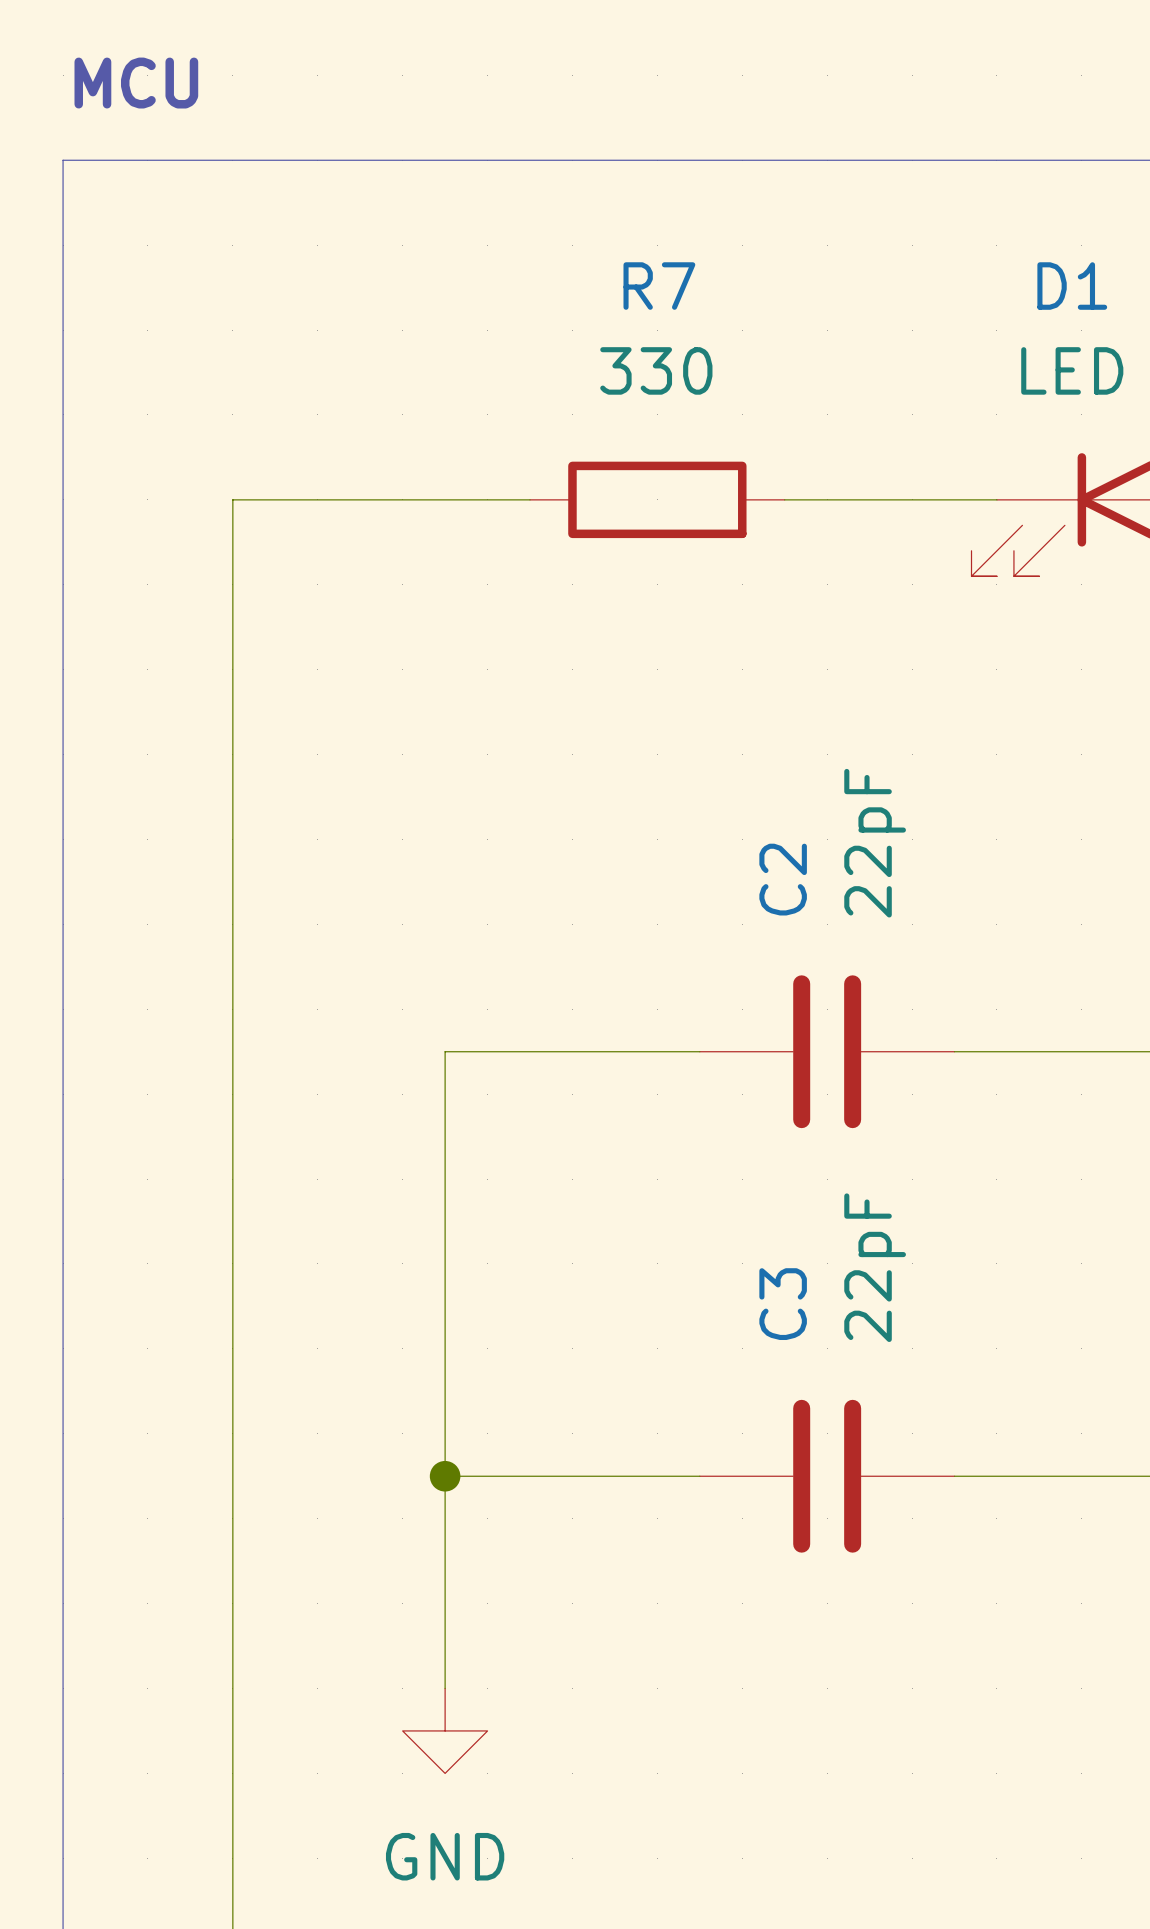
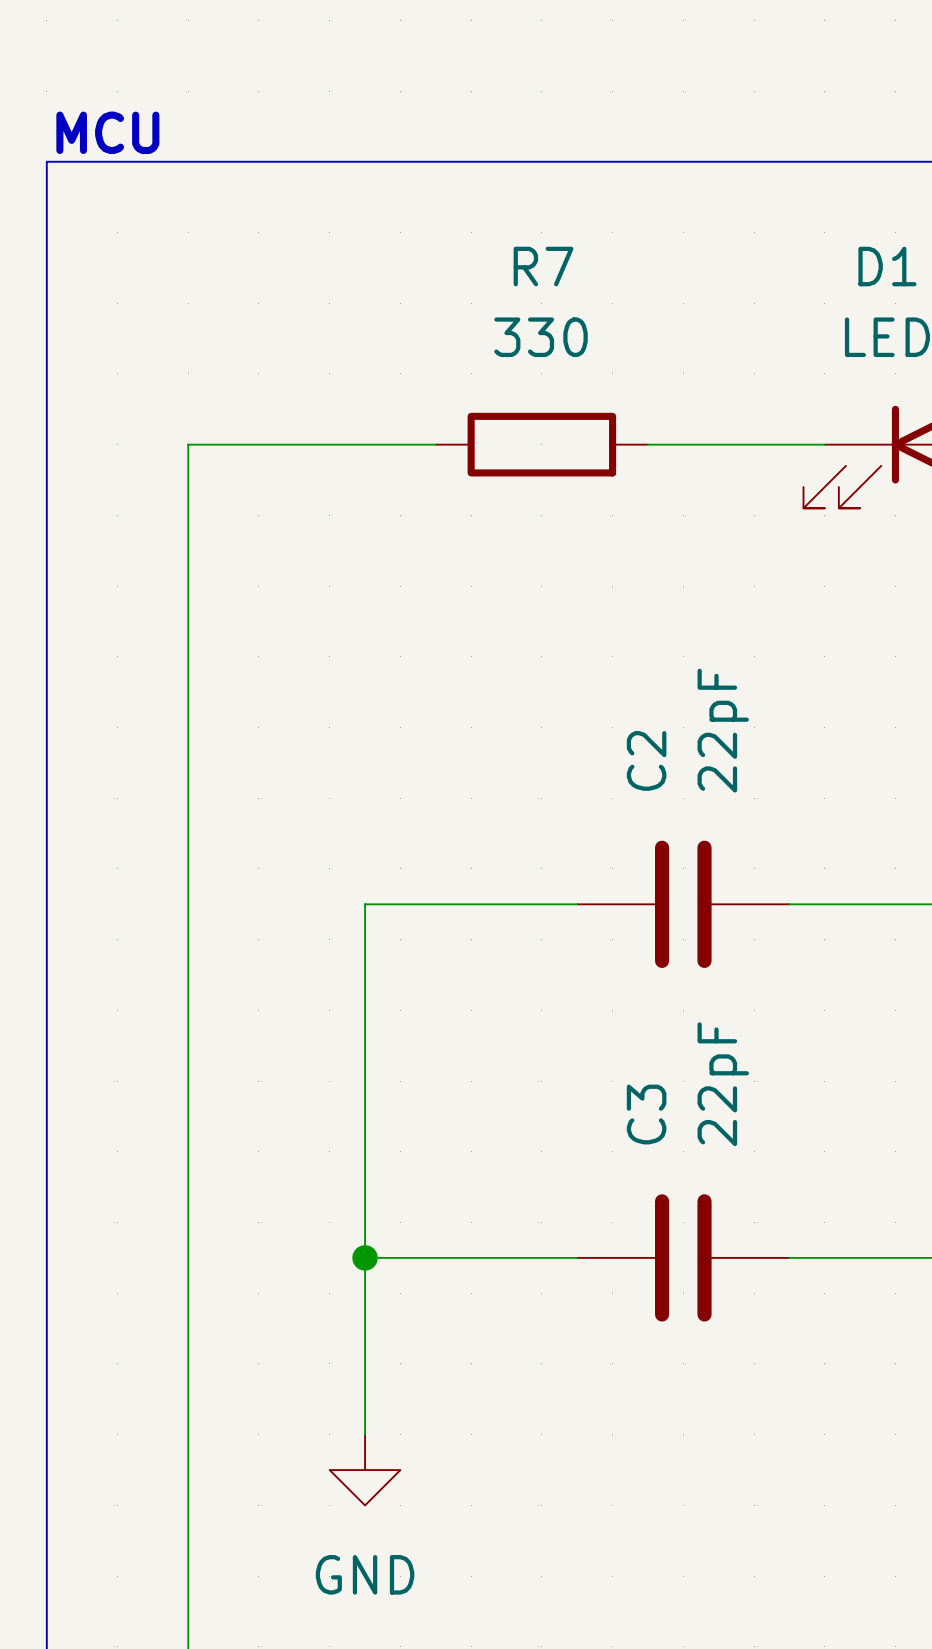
text position: MCU (136, 83) -> MCU (107, 132)

